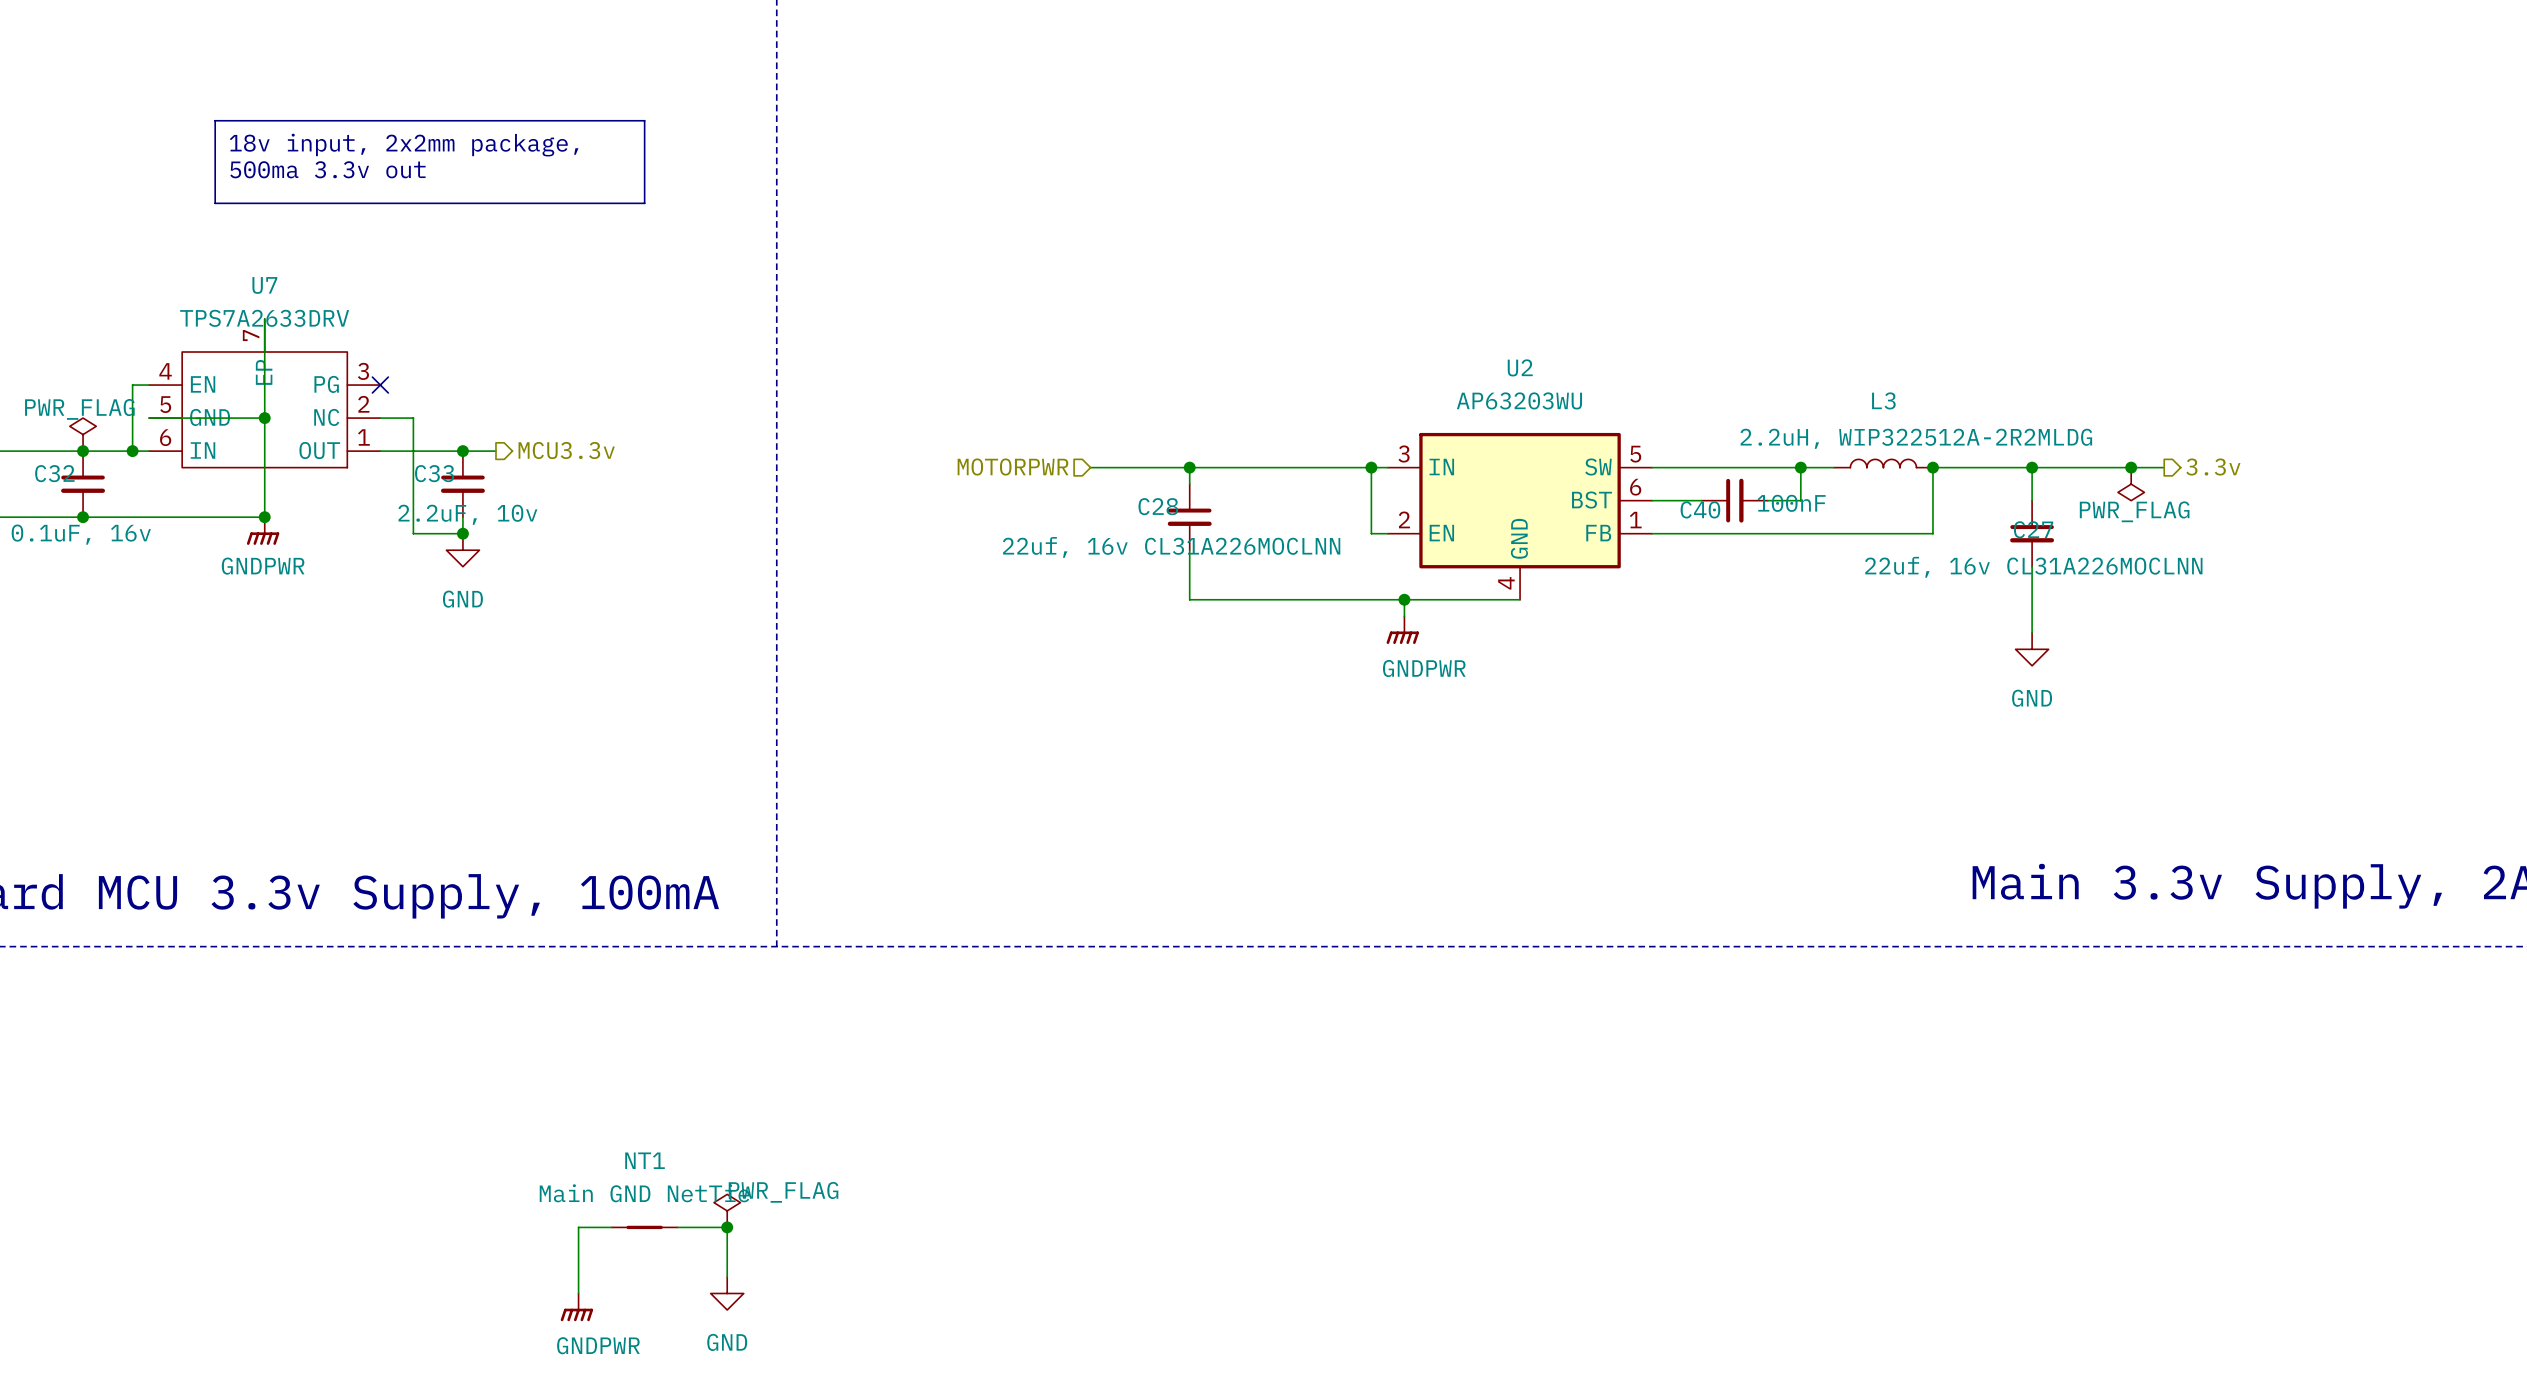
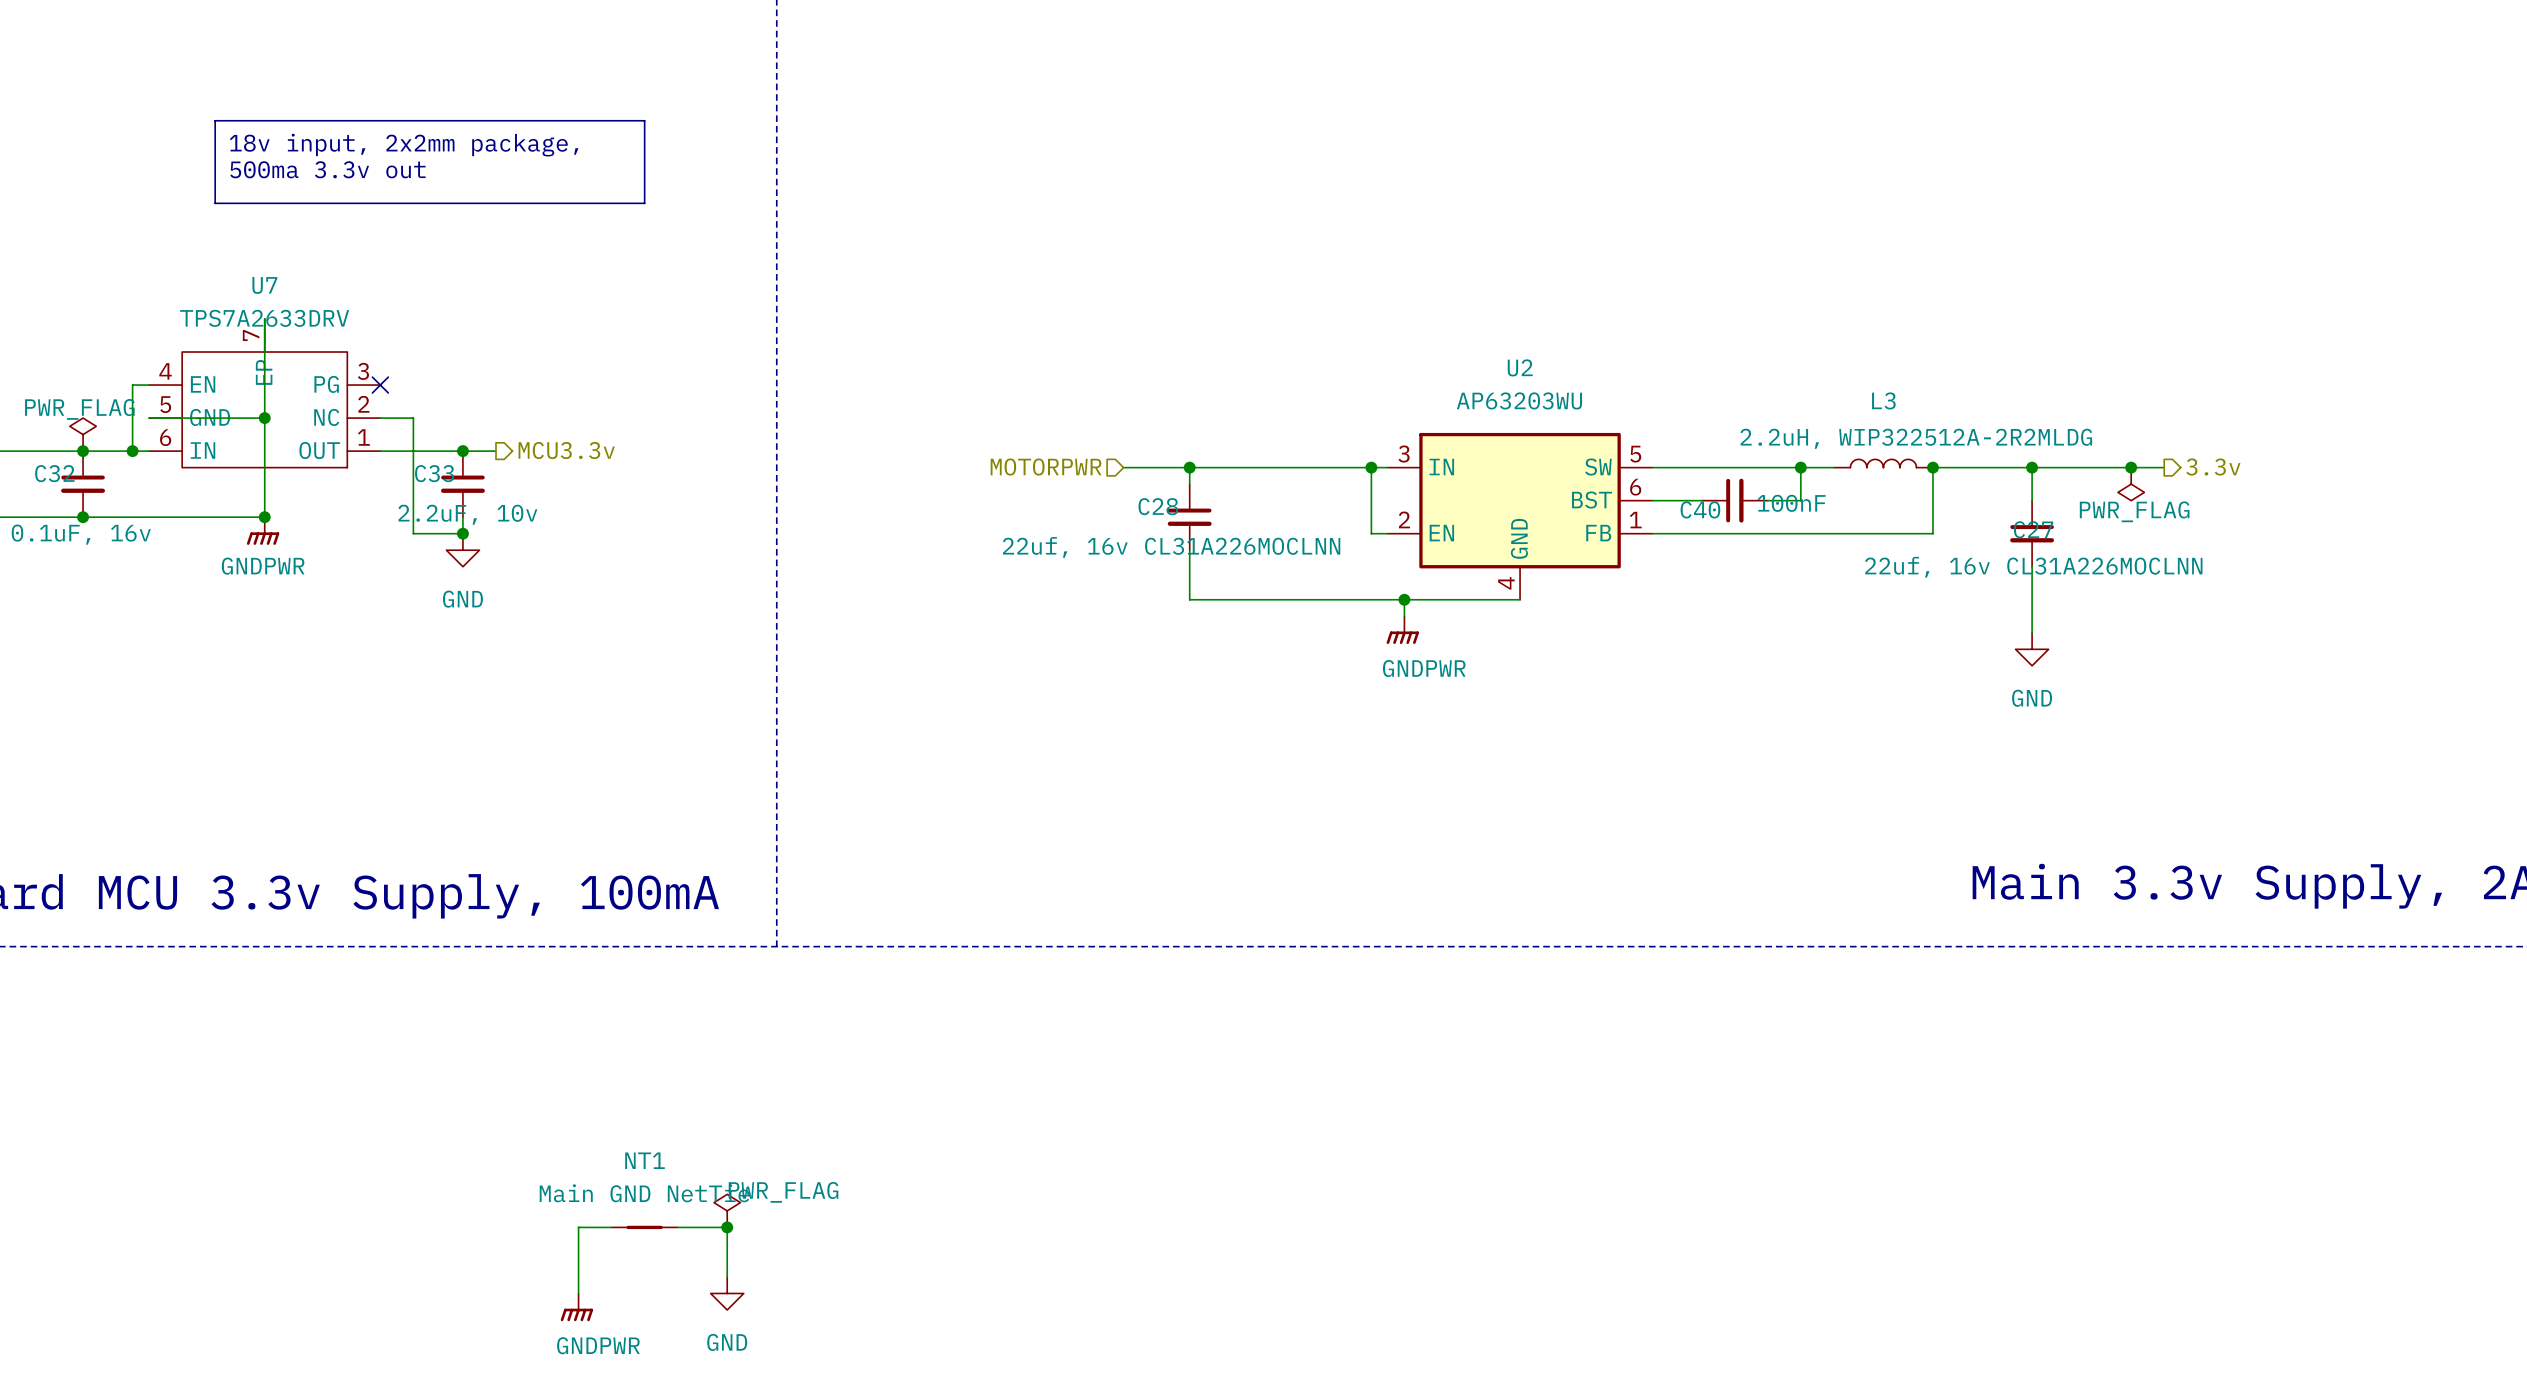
hierarchical label position: MOTORPWR (1013, 467) -> MOTORPWR (1046, 467)
wire: (1090, 467) (1123, 467) -> none

